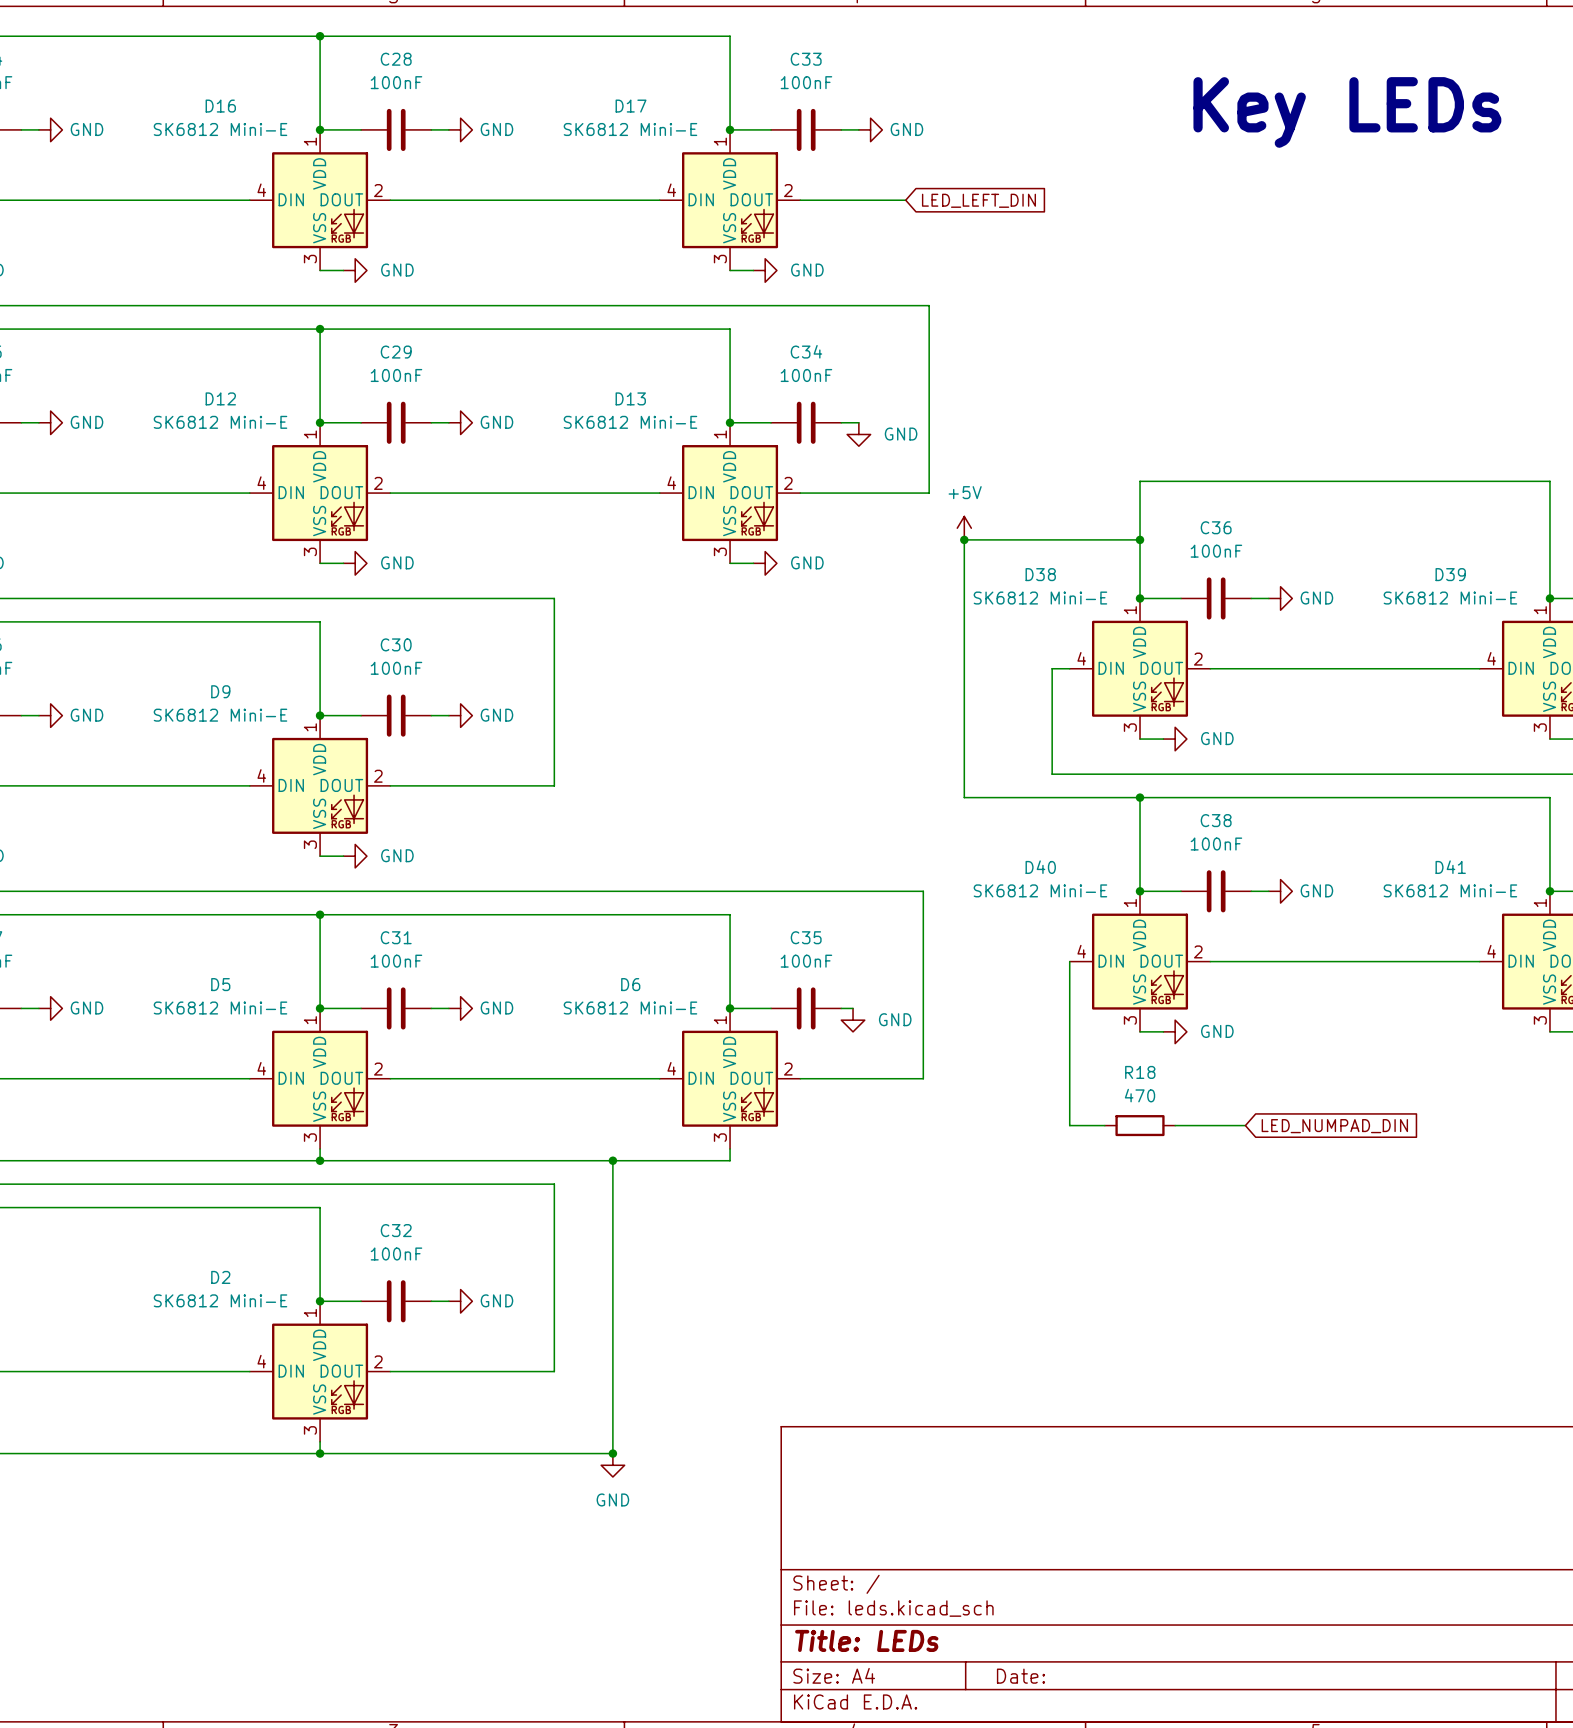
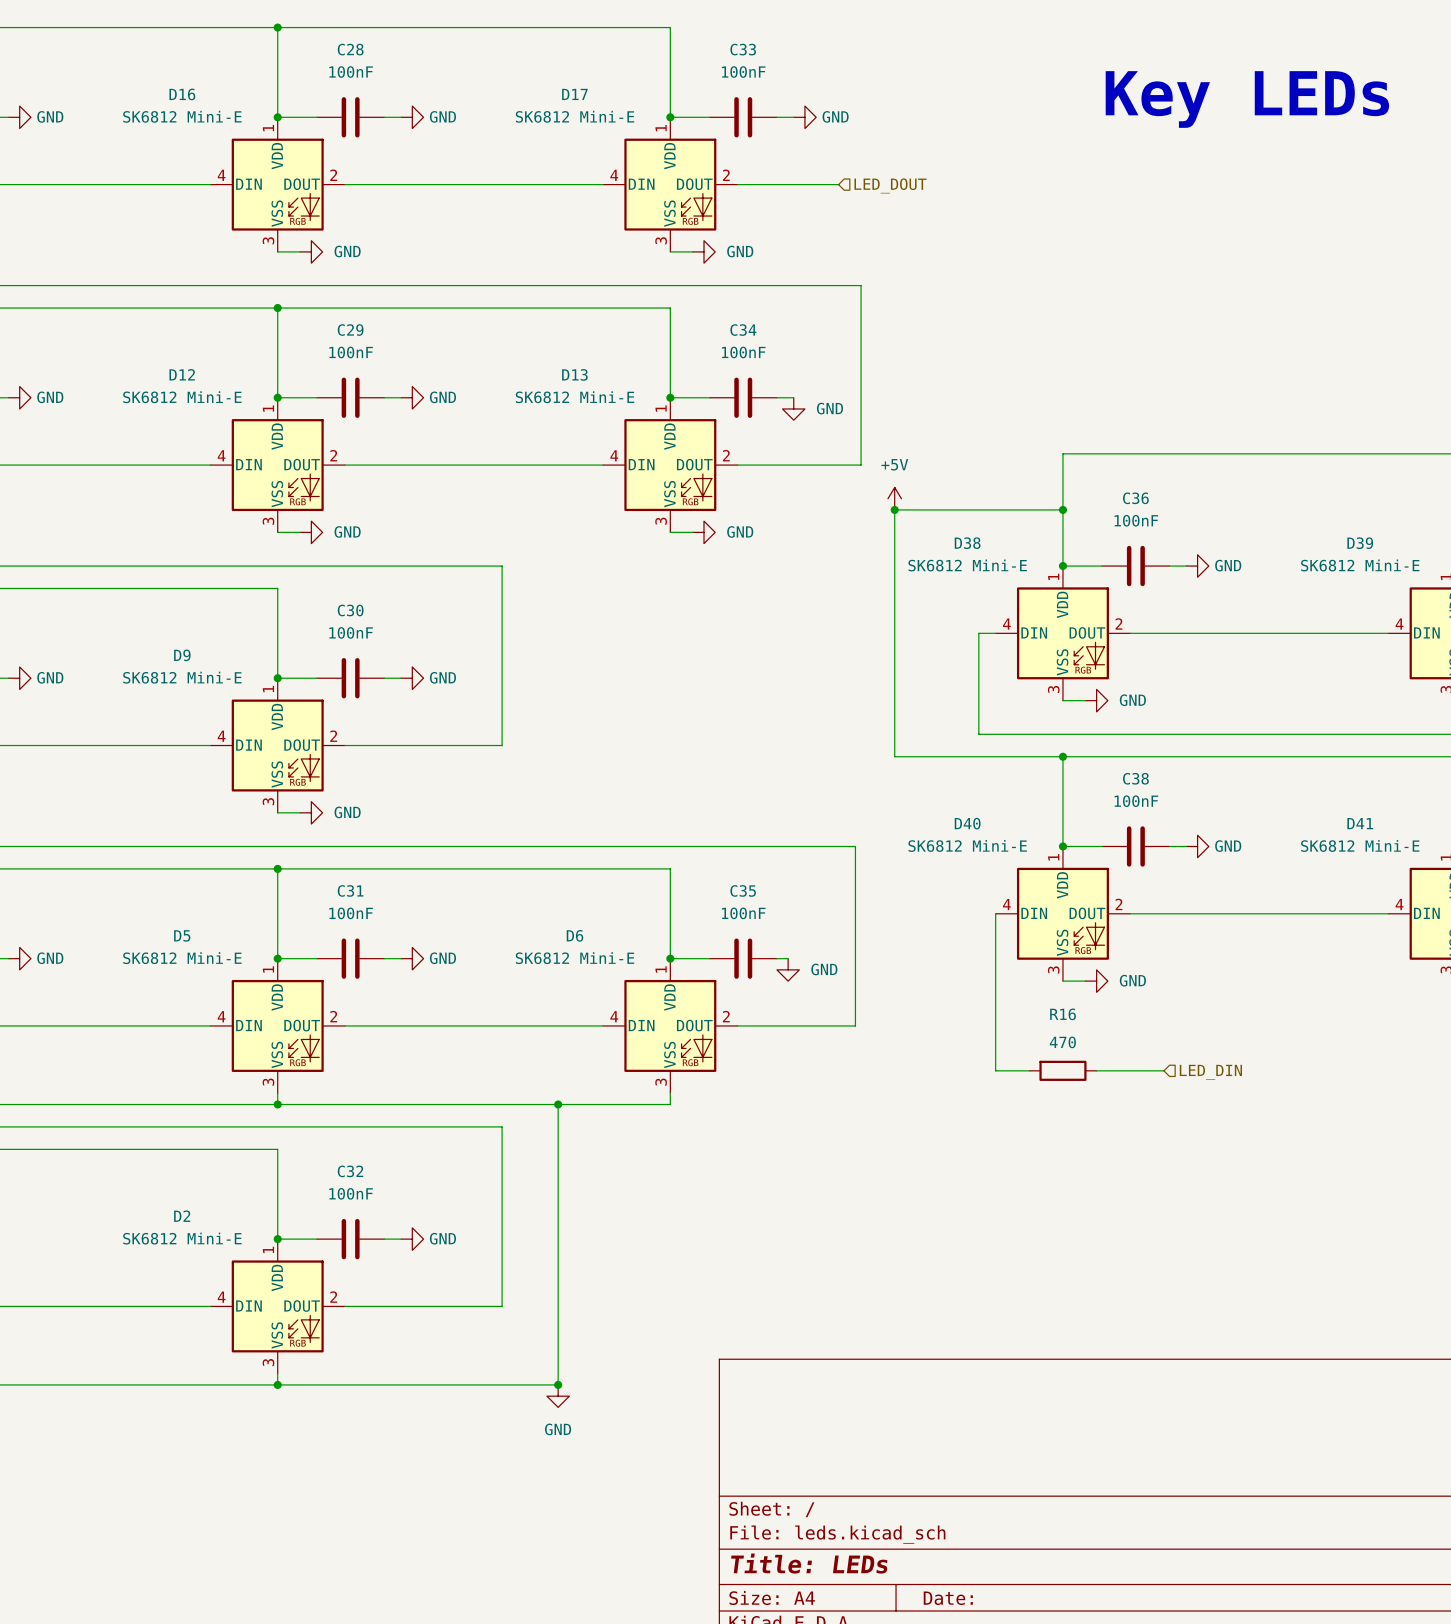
hierarchical label: none -> LED_DOUT (890, 185)
global label: LED_LEFT_DIN (978, 200) -> none
R18 name: R18 (1140, 1072) -> R16 (1063, 1014)
hierarchical label: none -> LED_DIN (1210, 1072)
global label: LED_NUMPAD_DIN (1334, 1126) -> none

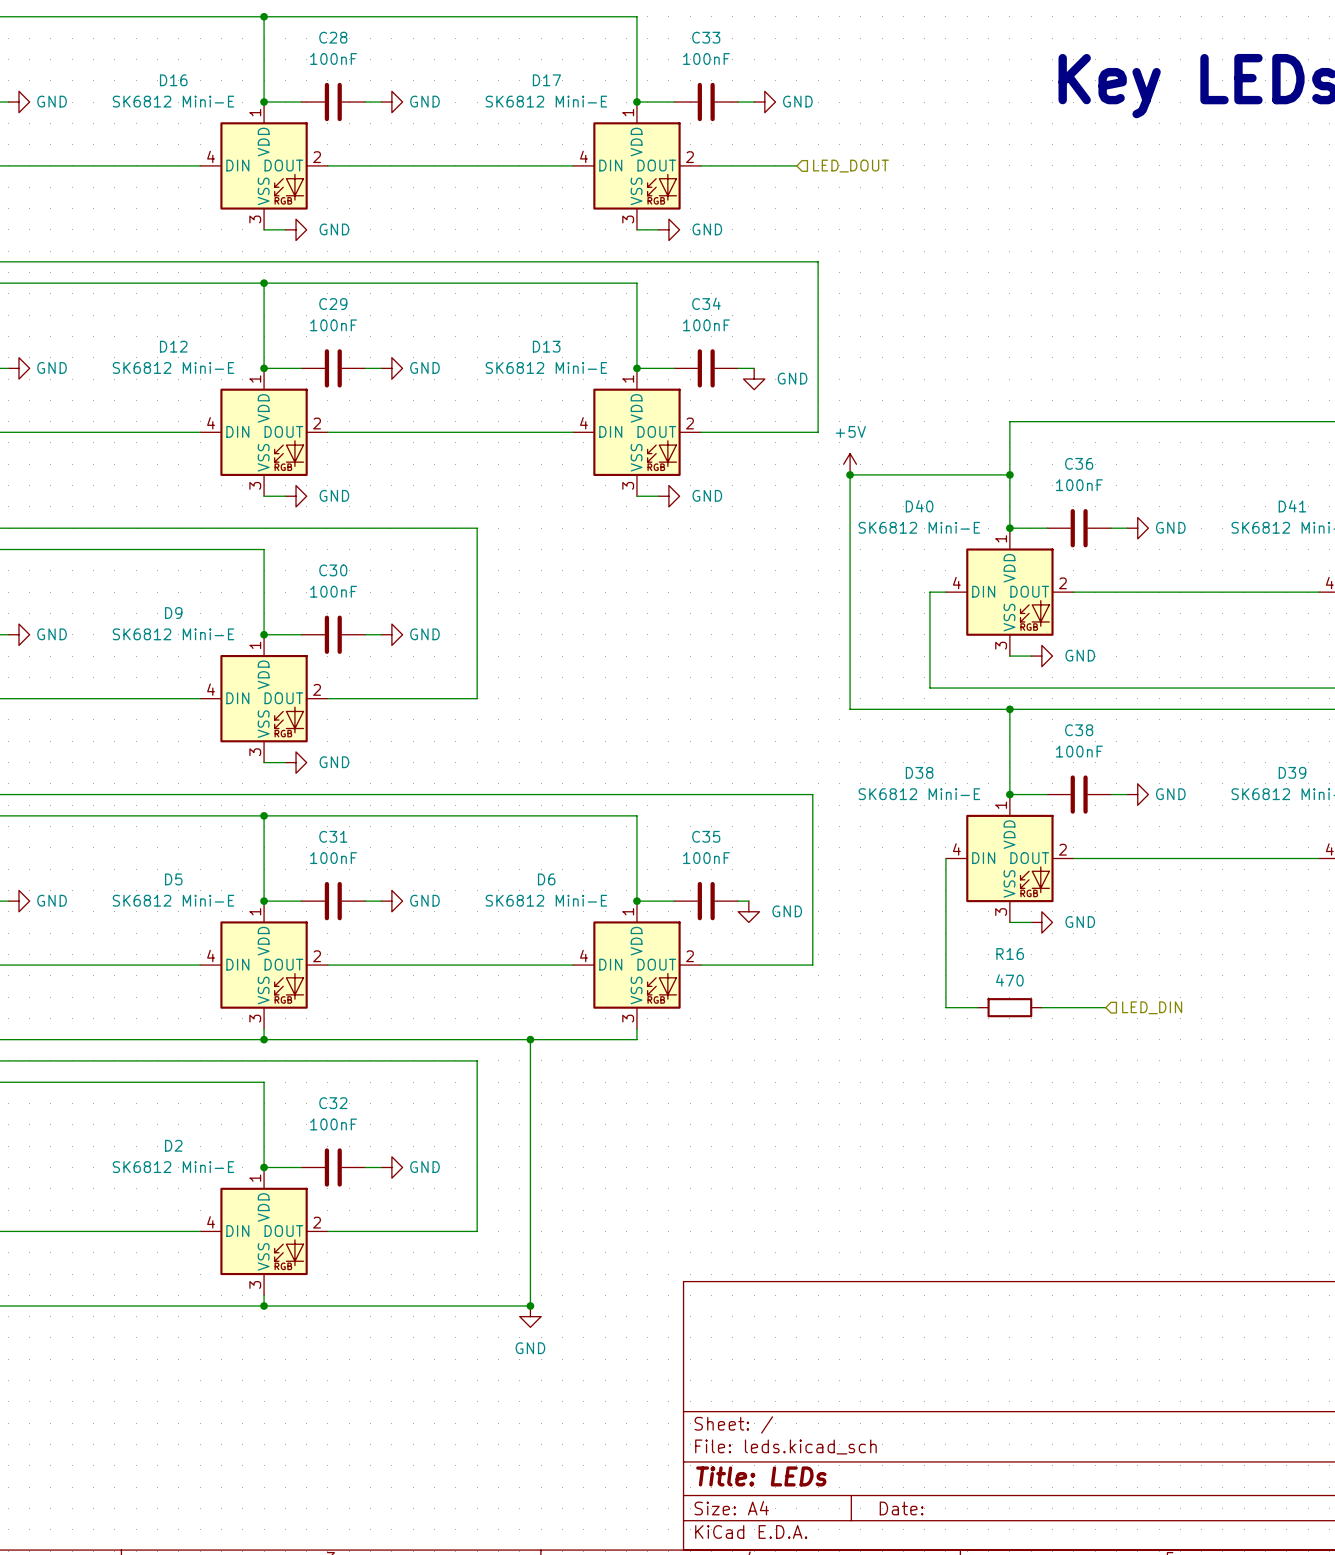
D38 name: D38 (967, 543) -> D40 (919, 506)
D39 name: D39 (1360, 543) -> D41 (1292, 506)
D40 name: D40 (967, 823) -> D38 (919, 772)
D41 name: D41 (1360, 823) -> D39 (1292, 772)

